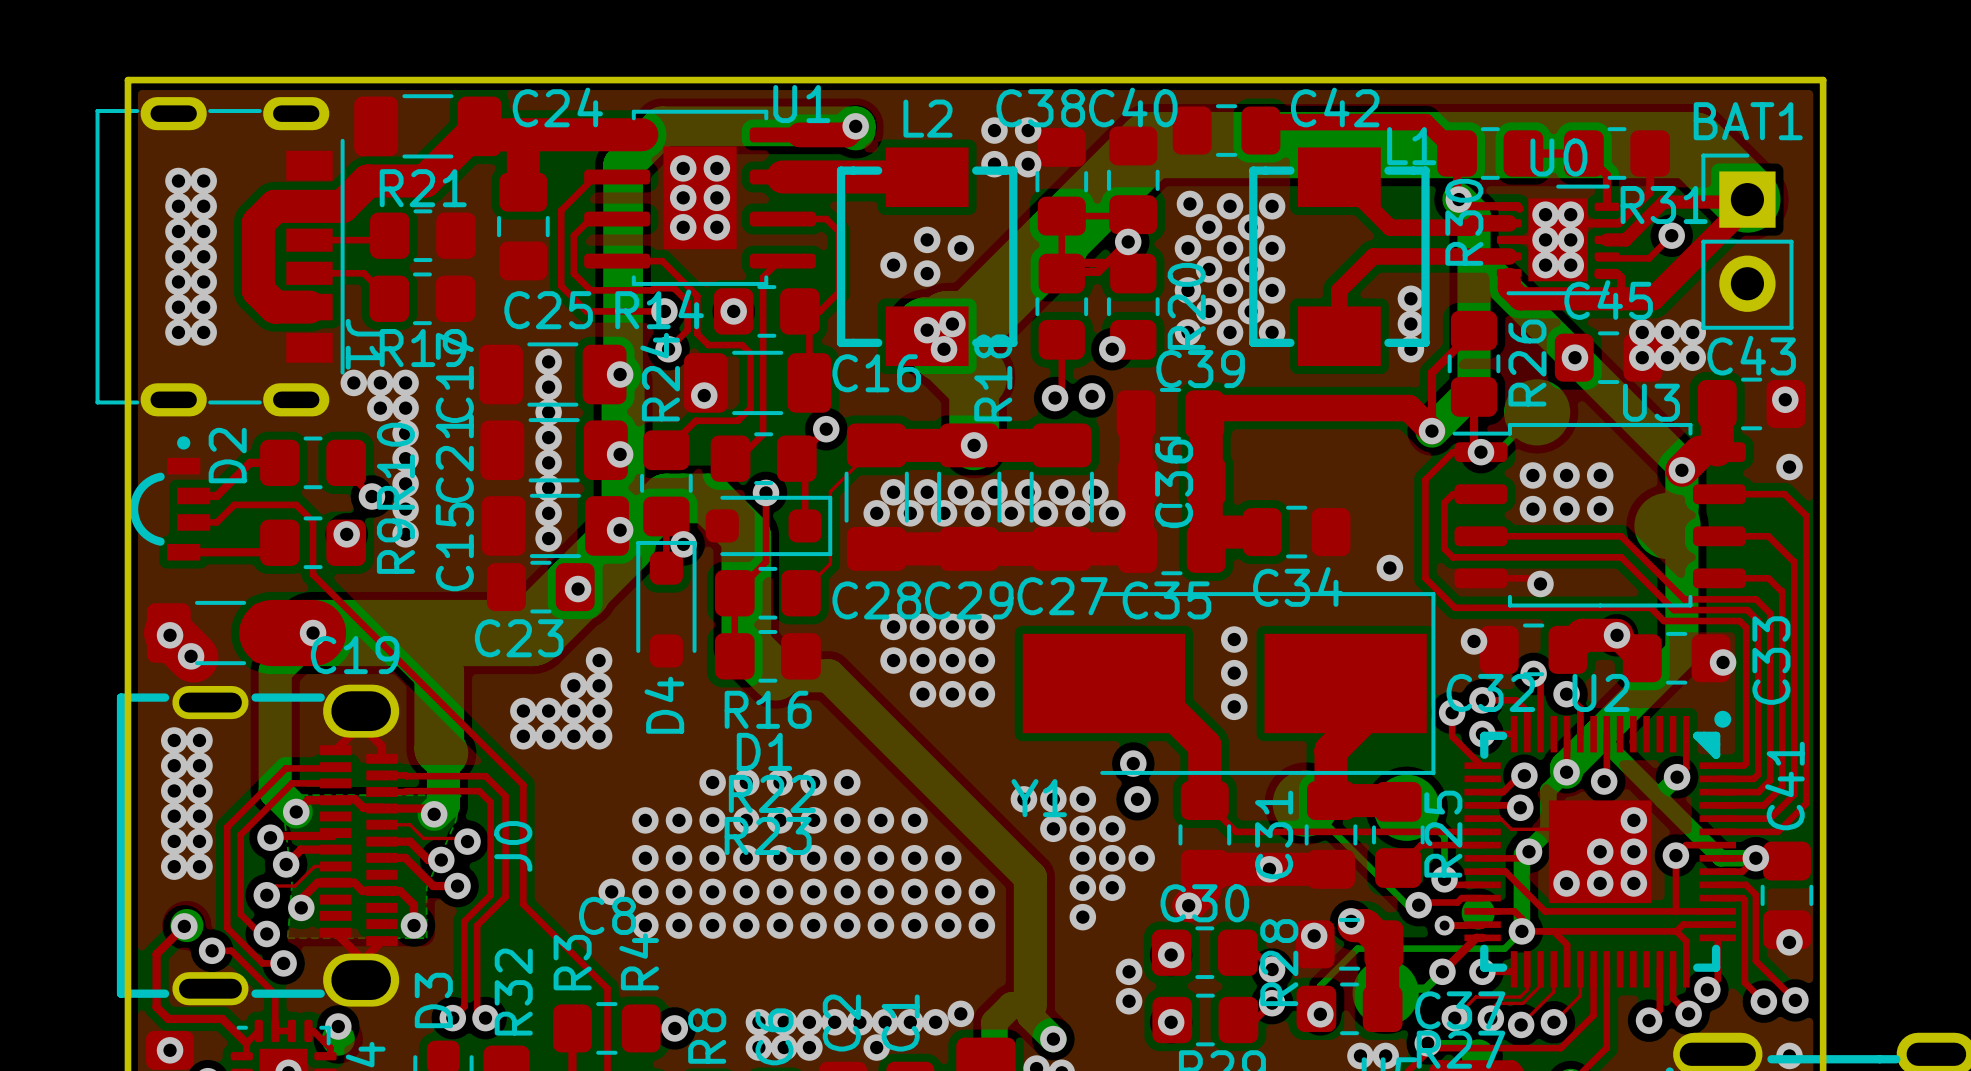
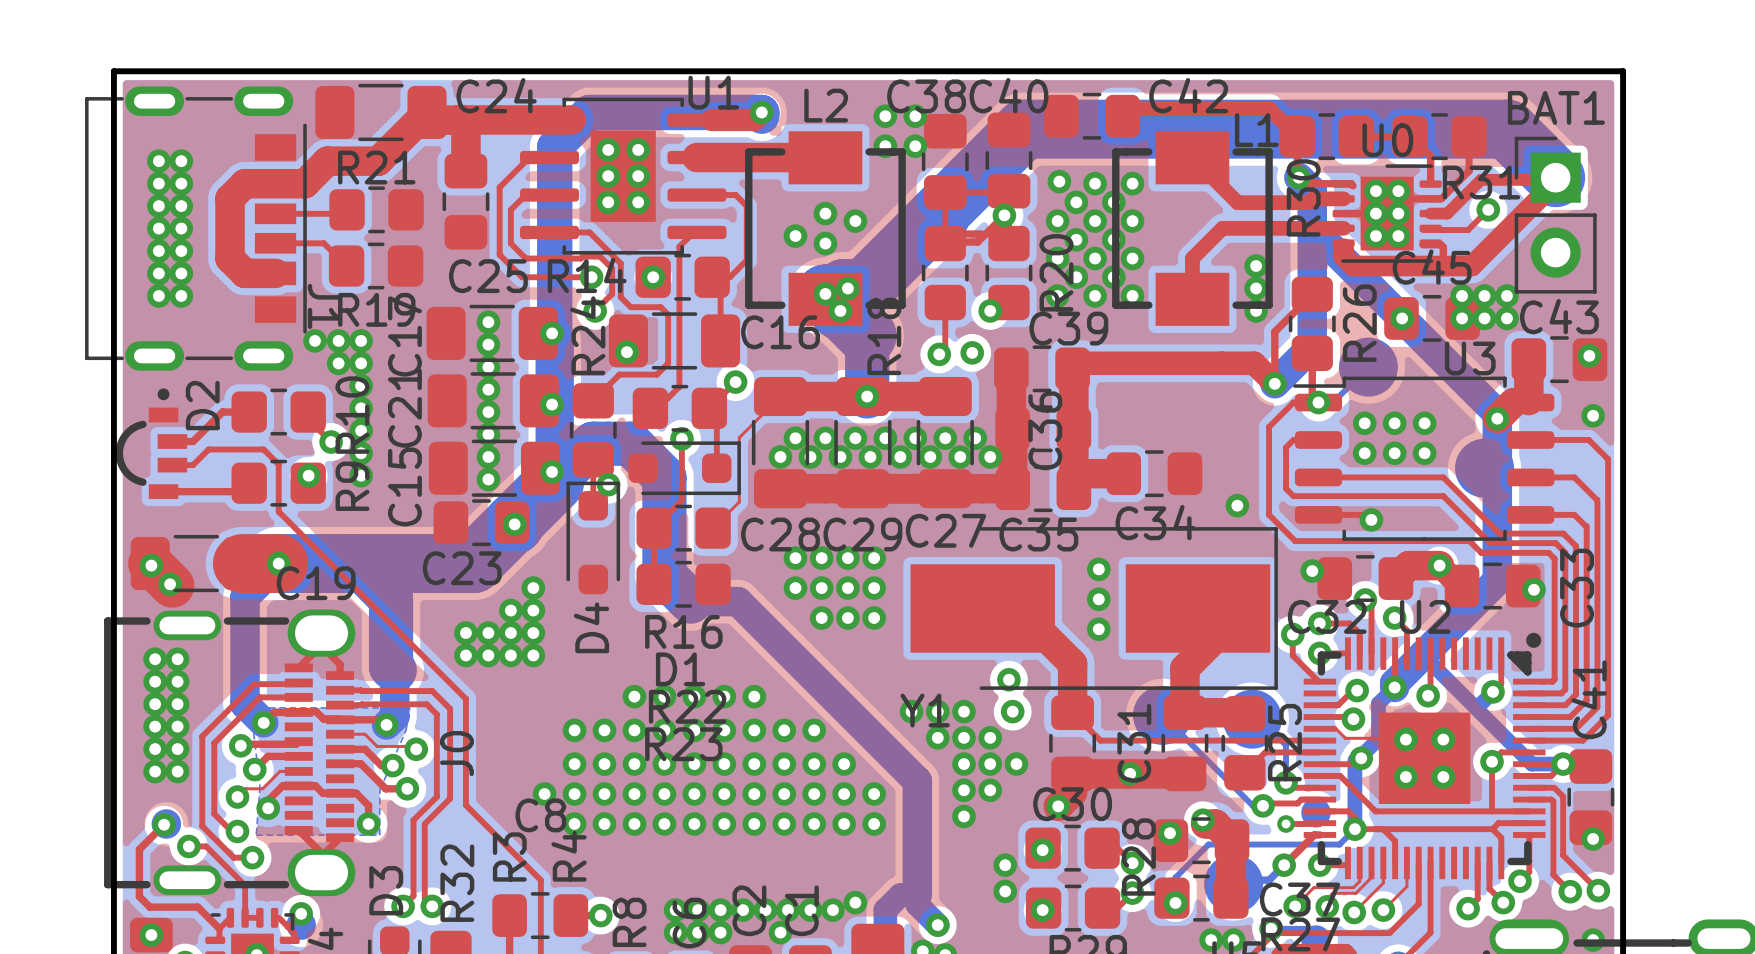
via: (1633, 820) -> none
via: none -> (1405, 739)
via: none -> (1443, 739)
via: (1600, 851) -> none
via: (1633, 851) -> none
via: none -> (1405, 777)
via: none -> (1443, 777)
via: (1566, 883) -> none
via: (1600, 883) -> none
via: (1633, 883) -> none

